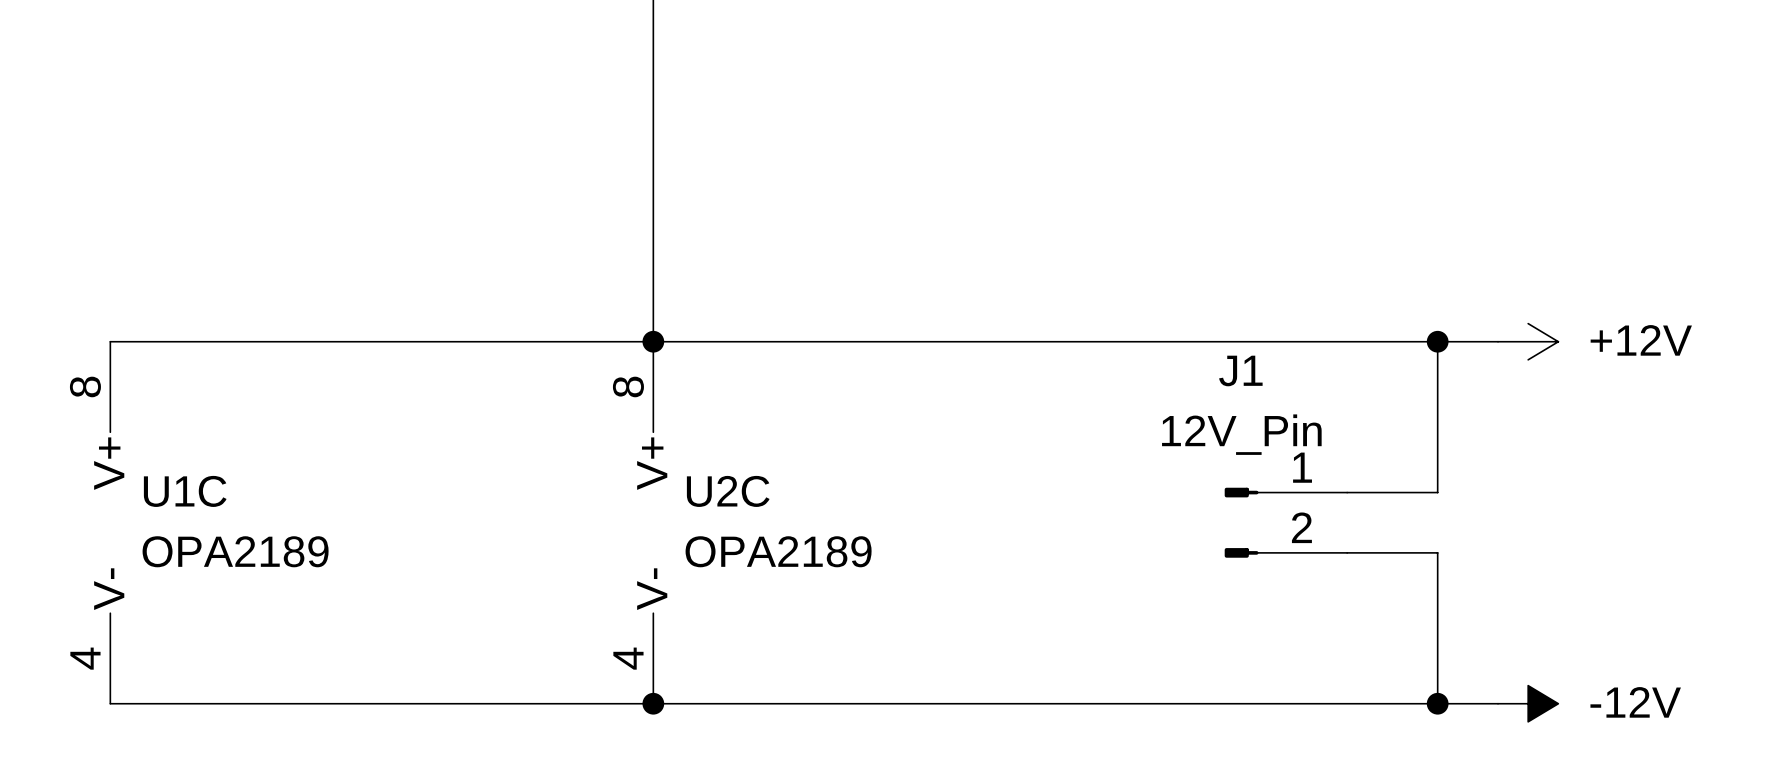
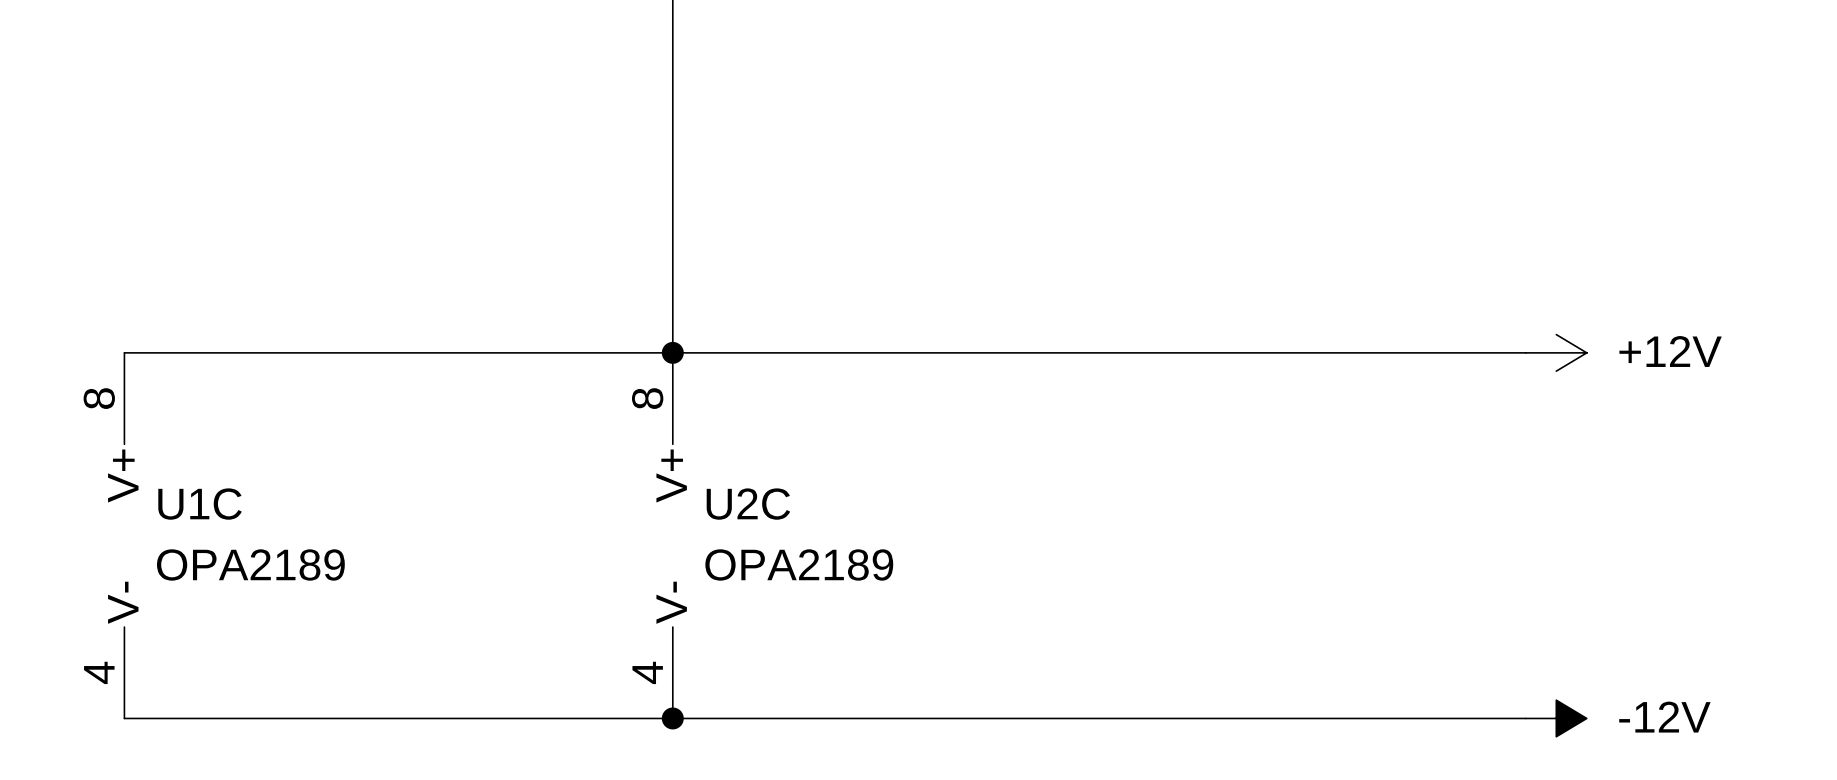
wire: (1437, 341) (1437, 492) (1347, 492) -> none
junction: (1437, 341) -> none
J1: 12V_Pin (1285, 522) -> none
wire: (1347, 552) (1437, 552) (1437, 703) -> none
junction: (1437, 703) -> none

